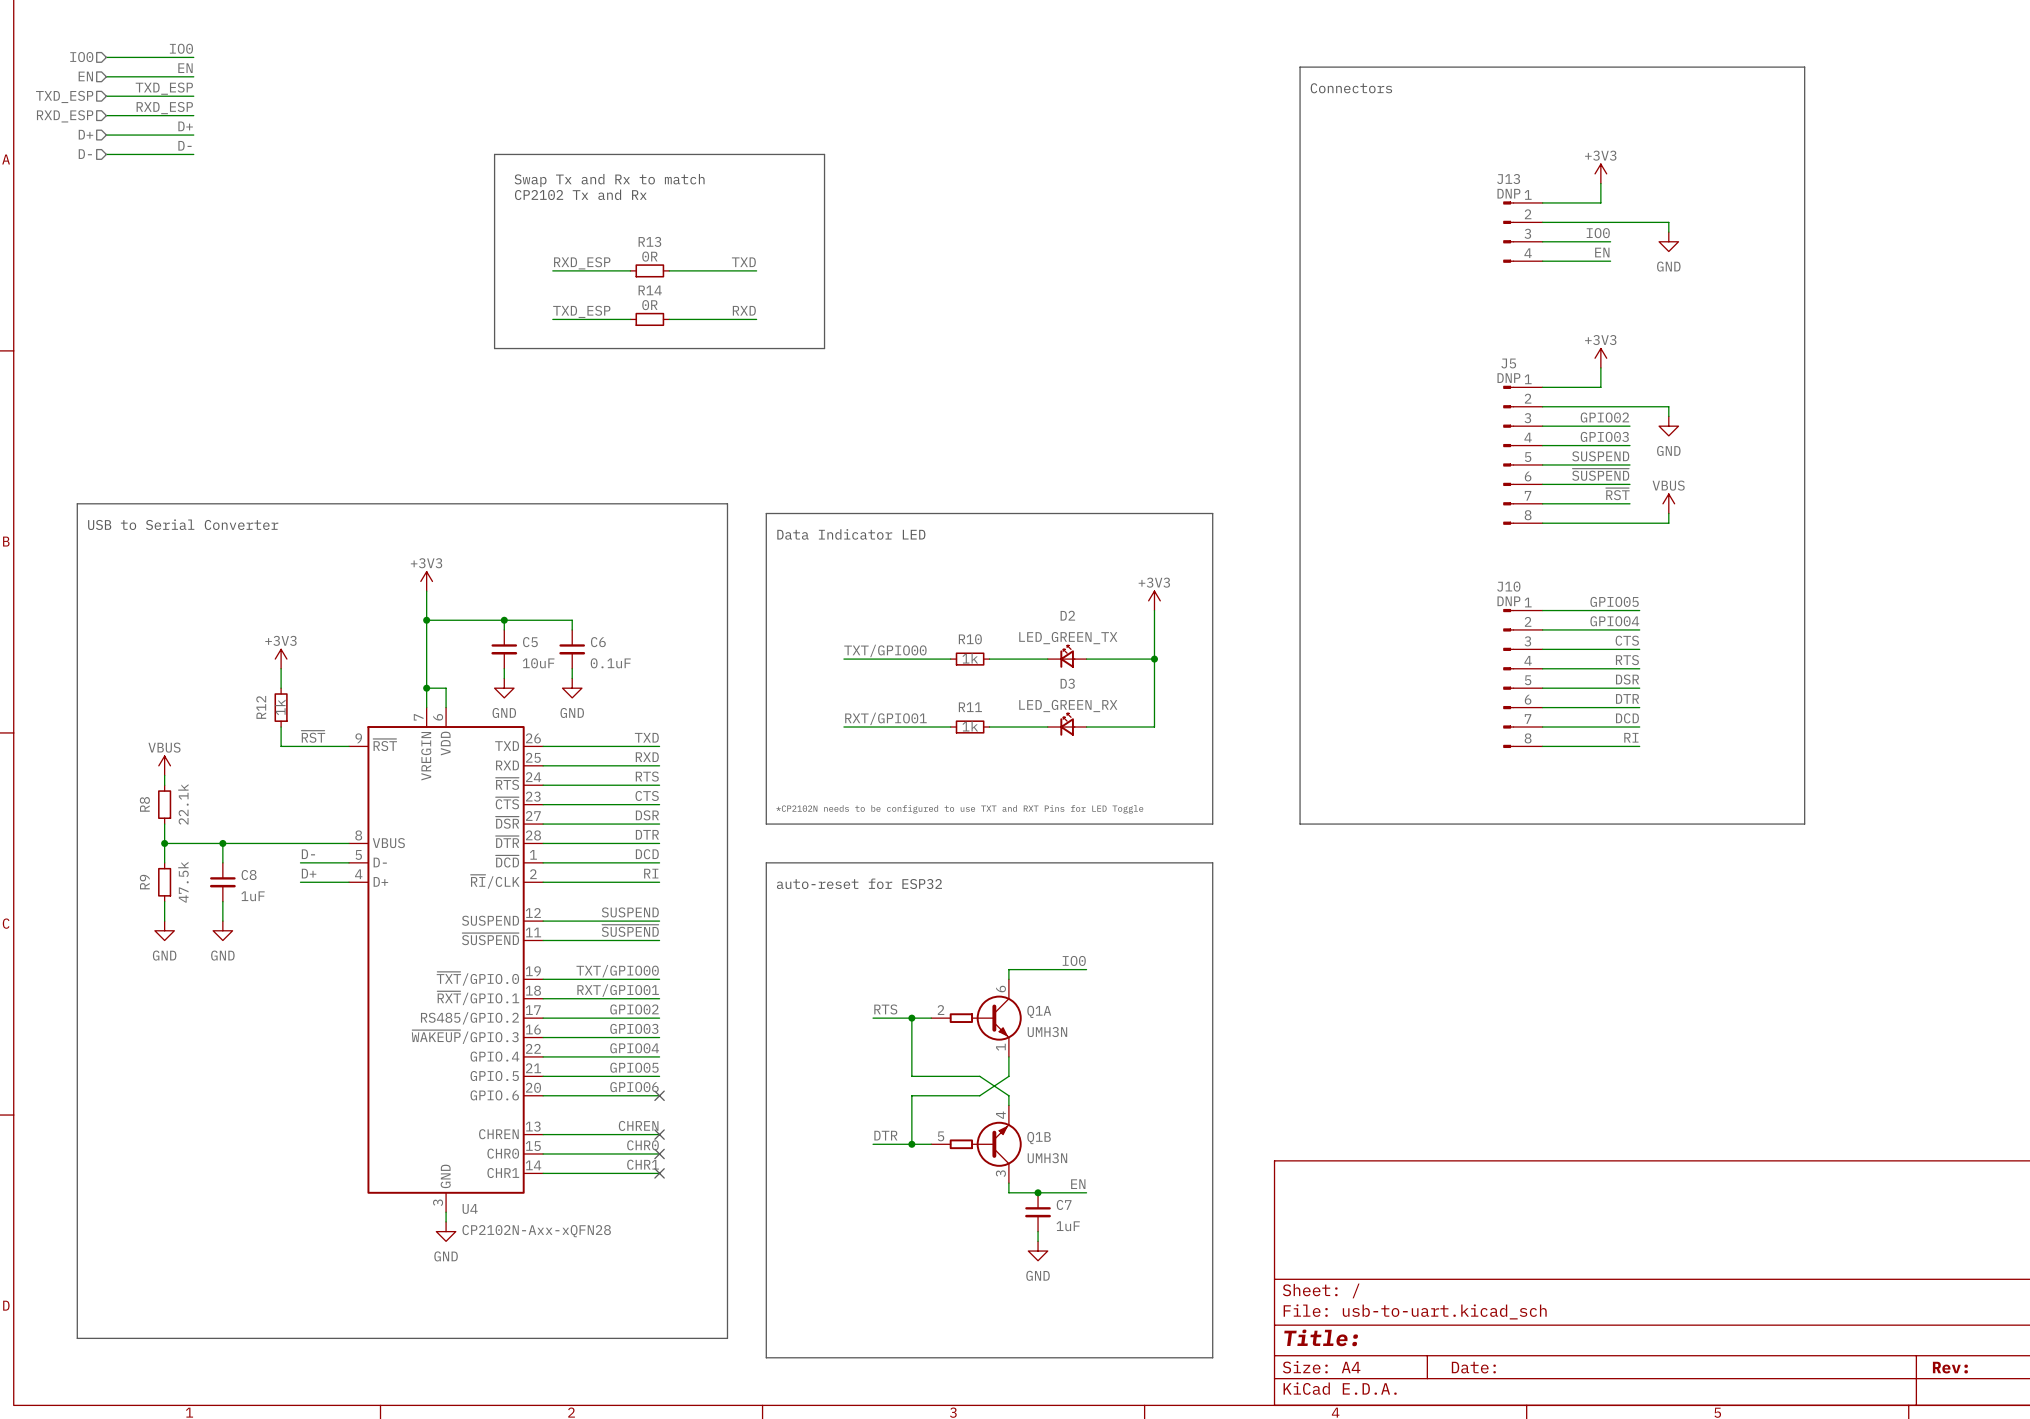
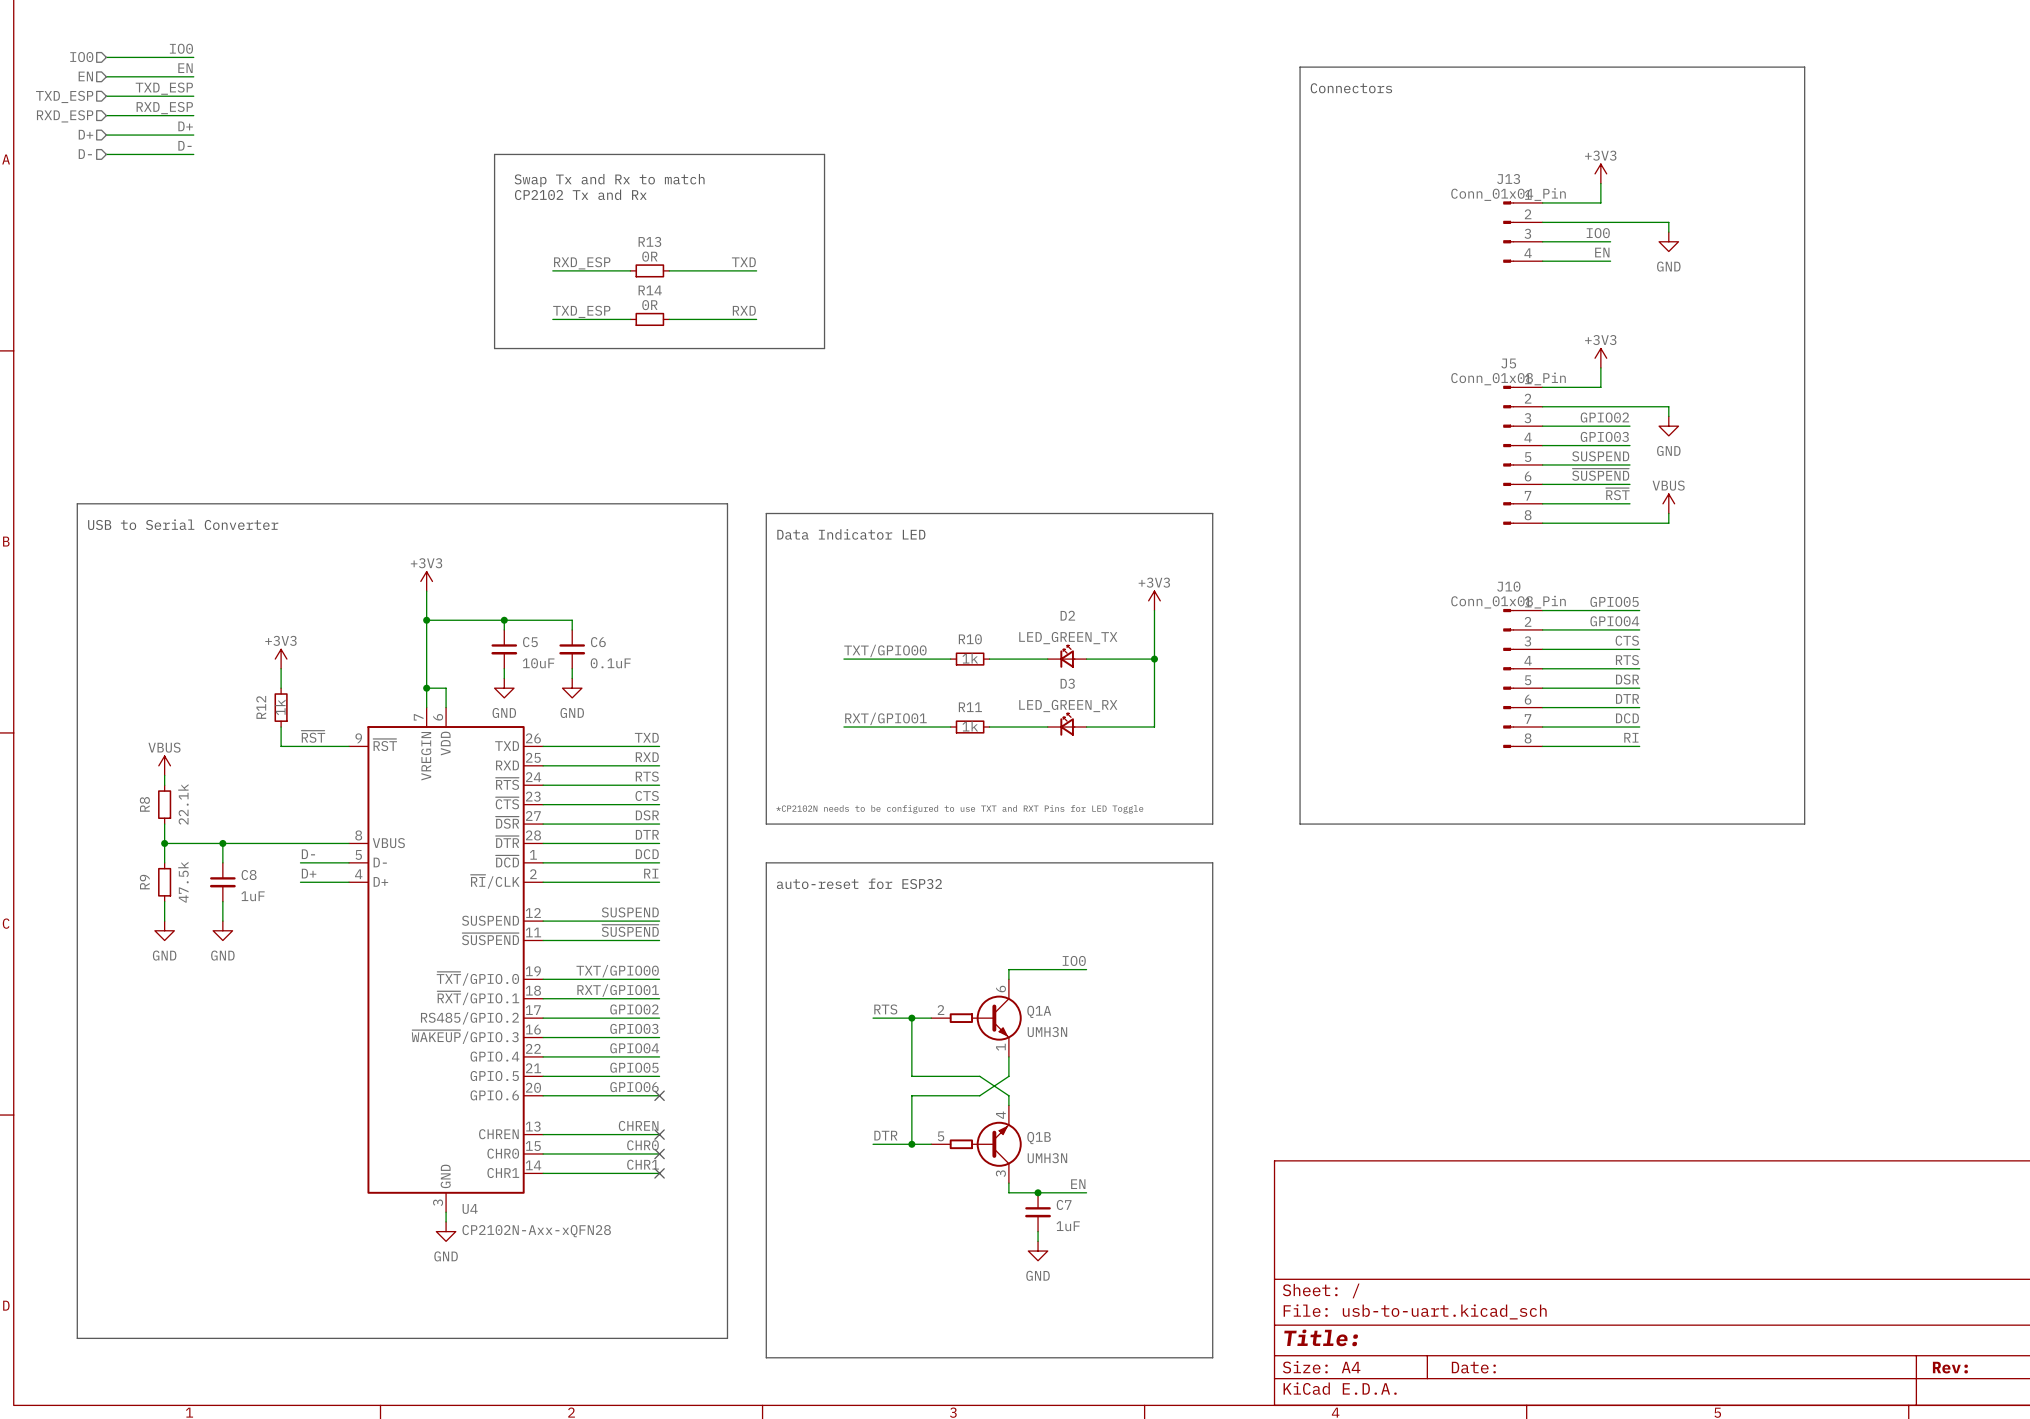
J13 value: DNP (1508, 193) -> Conn_01x04_Pin (1508, 194)
J5 value: DNP (1508, 378) -> Conn_01x08_Pin (1508, 378)
J10 value: DNP (1508, 601) -> Conn_01x08_Pin (1508, 602)

